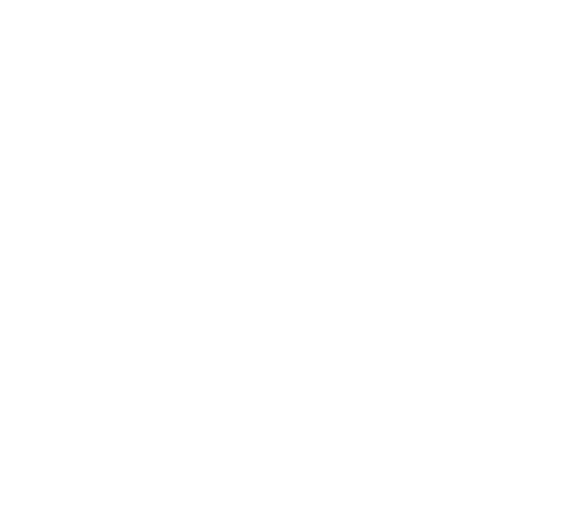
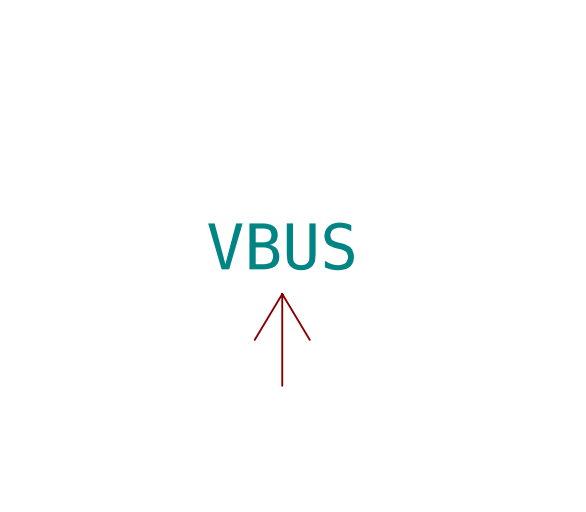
power symbol: none -> VBUS (282, 339)

